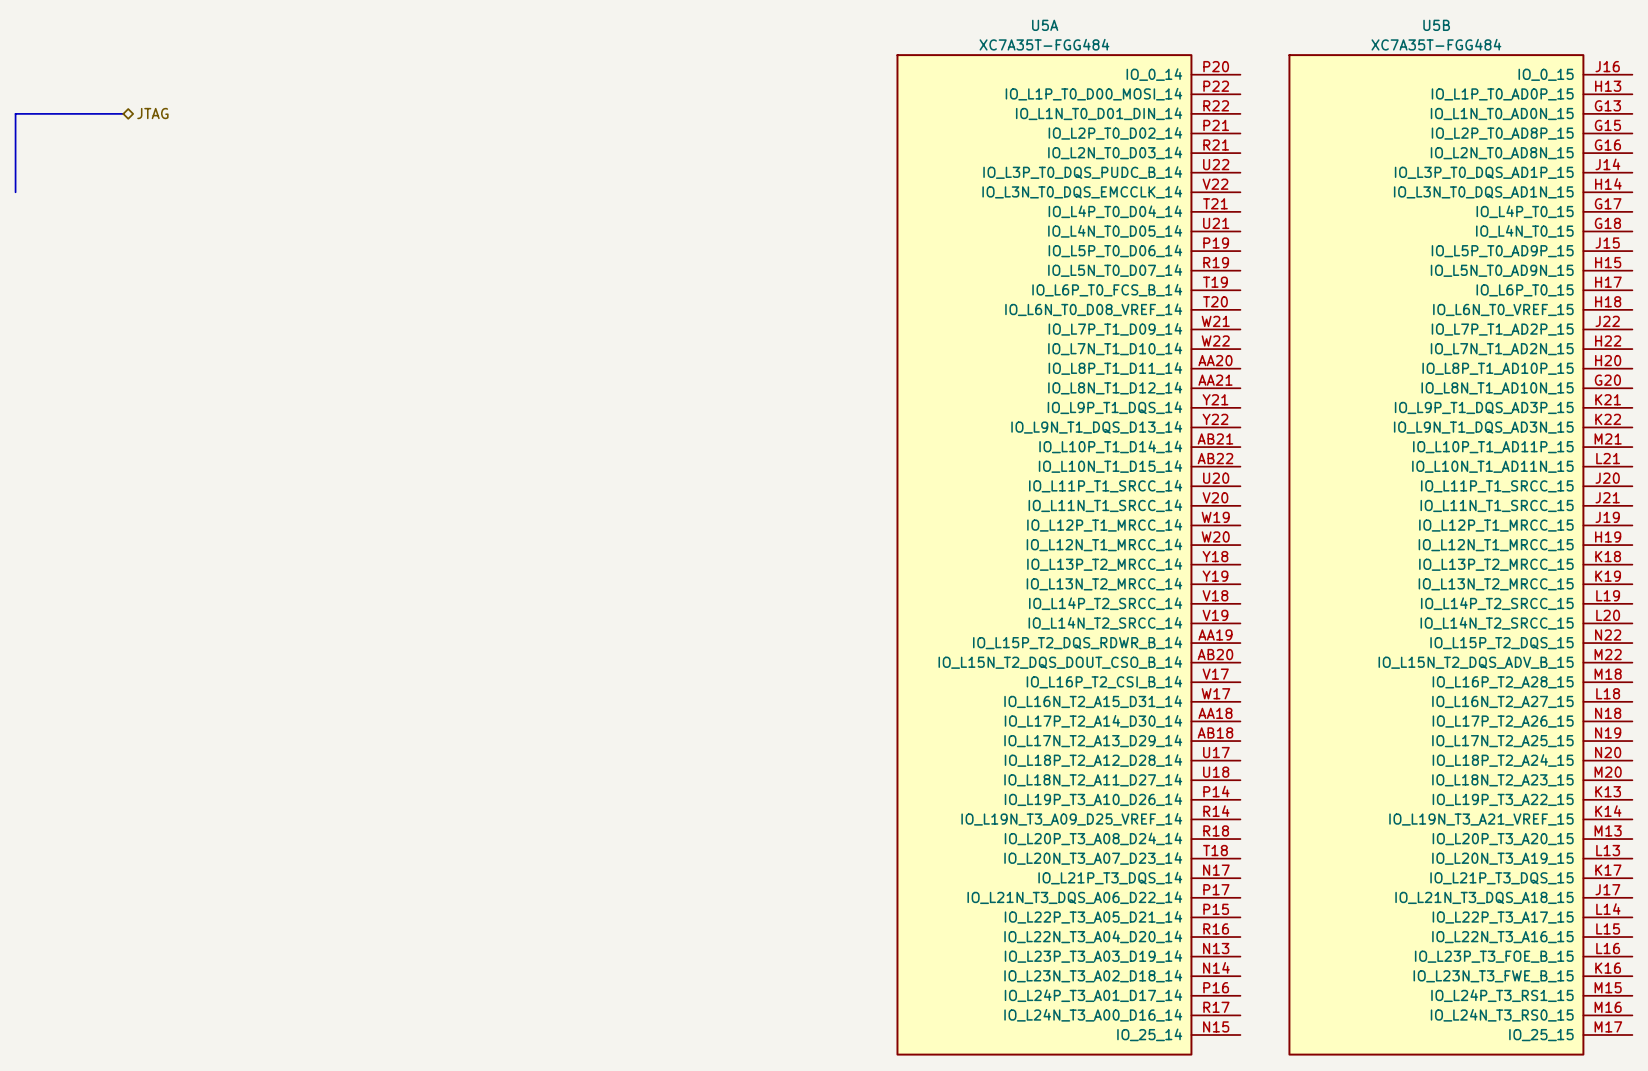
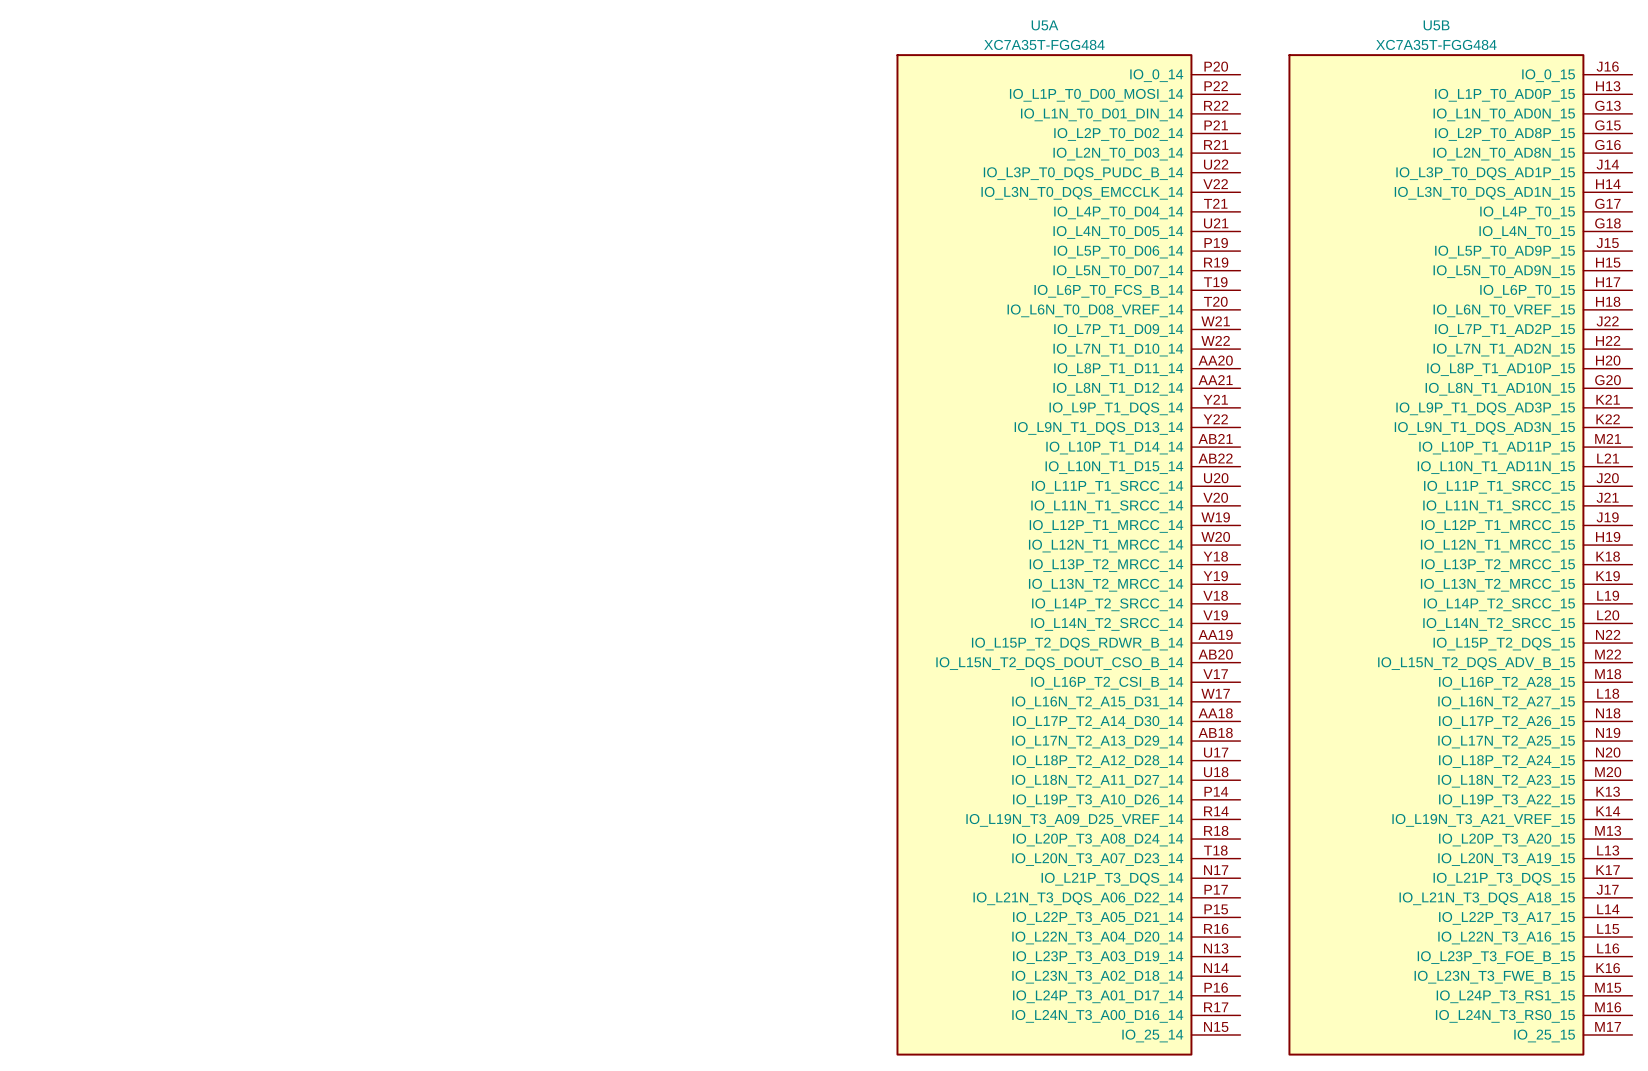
bus: (123, 113) (15, 113) (15, 192) -> none
hierarchical label: JTAG (152, 113) -> none

